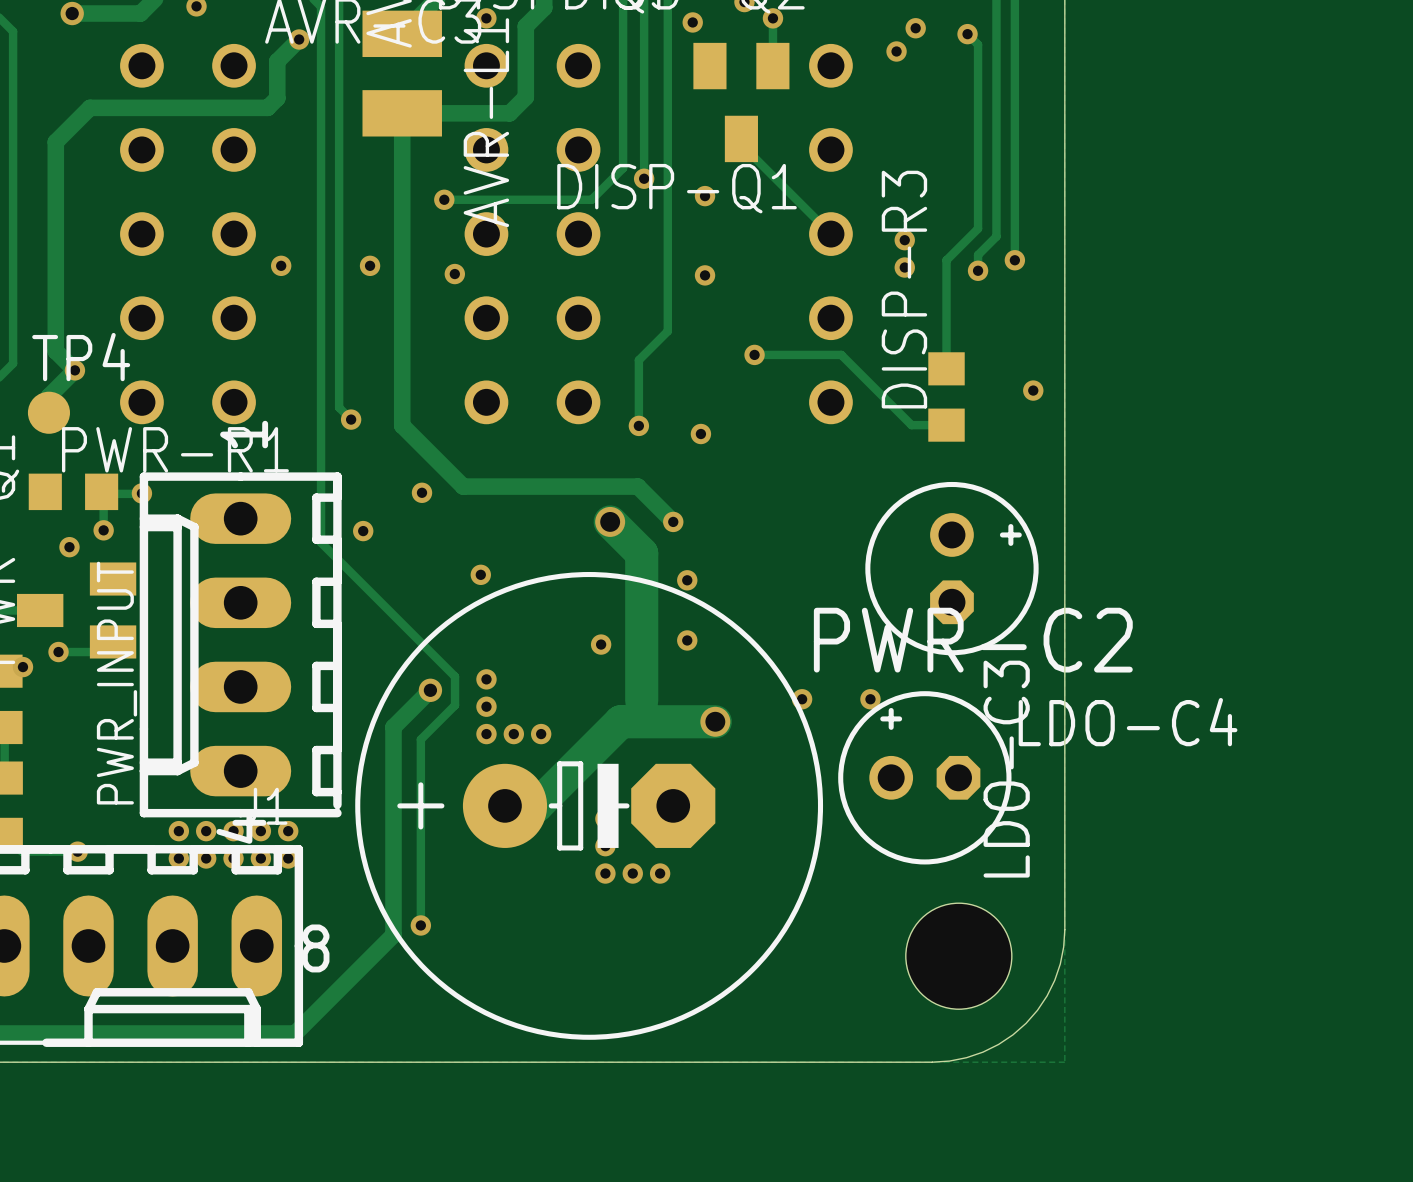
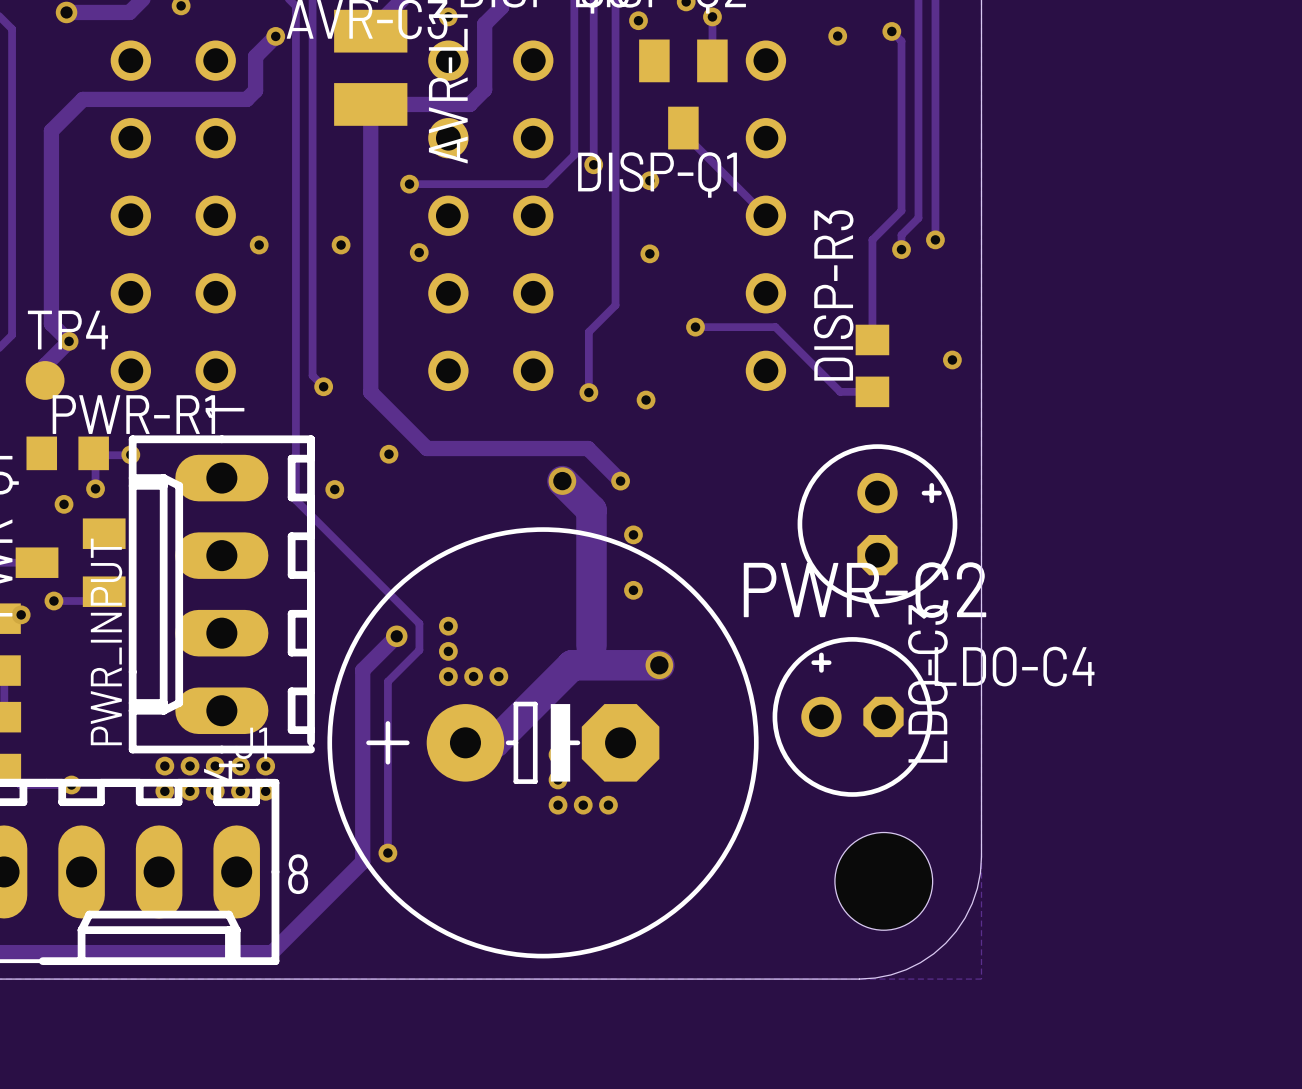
via: (915, 28) -> none
via: none -> (837, 36)
via: (896, 51) -> none
via: (904, 240) -> none
via: (904, 267) -> none
via: (480, 574) -> none
via: (601, 644) -> none
via: (802, 699) -> none
via: (870, 699) -> none

